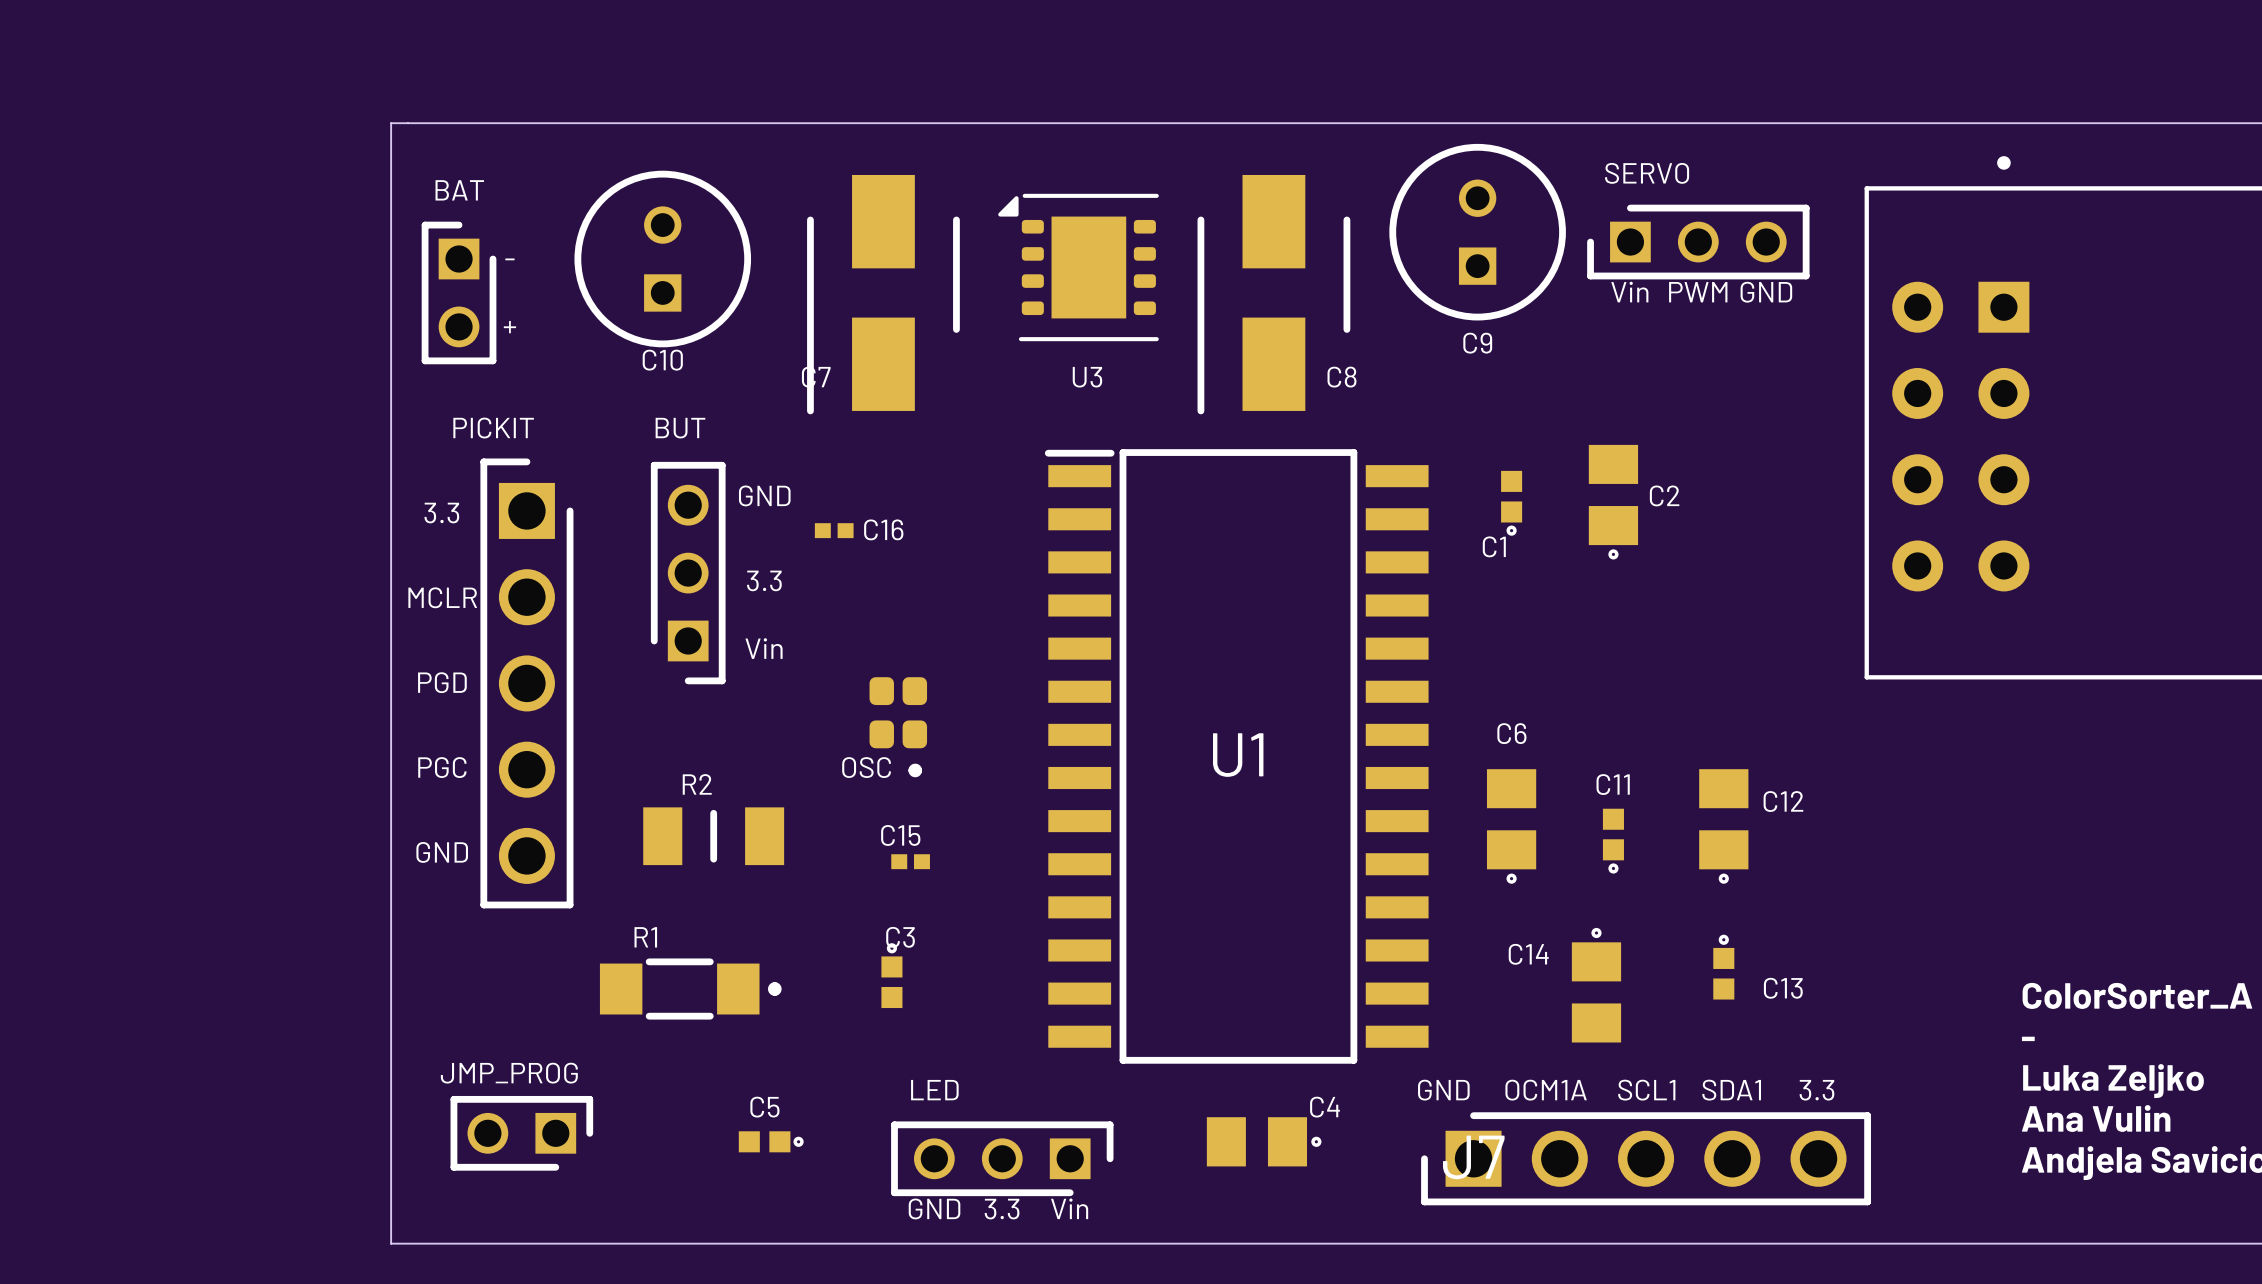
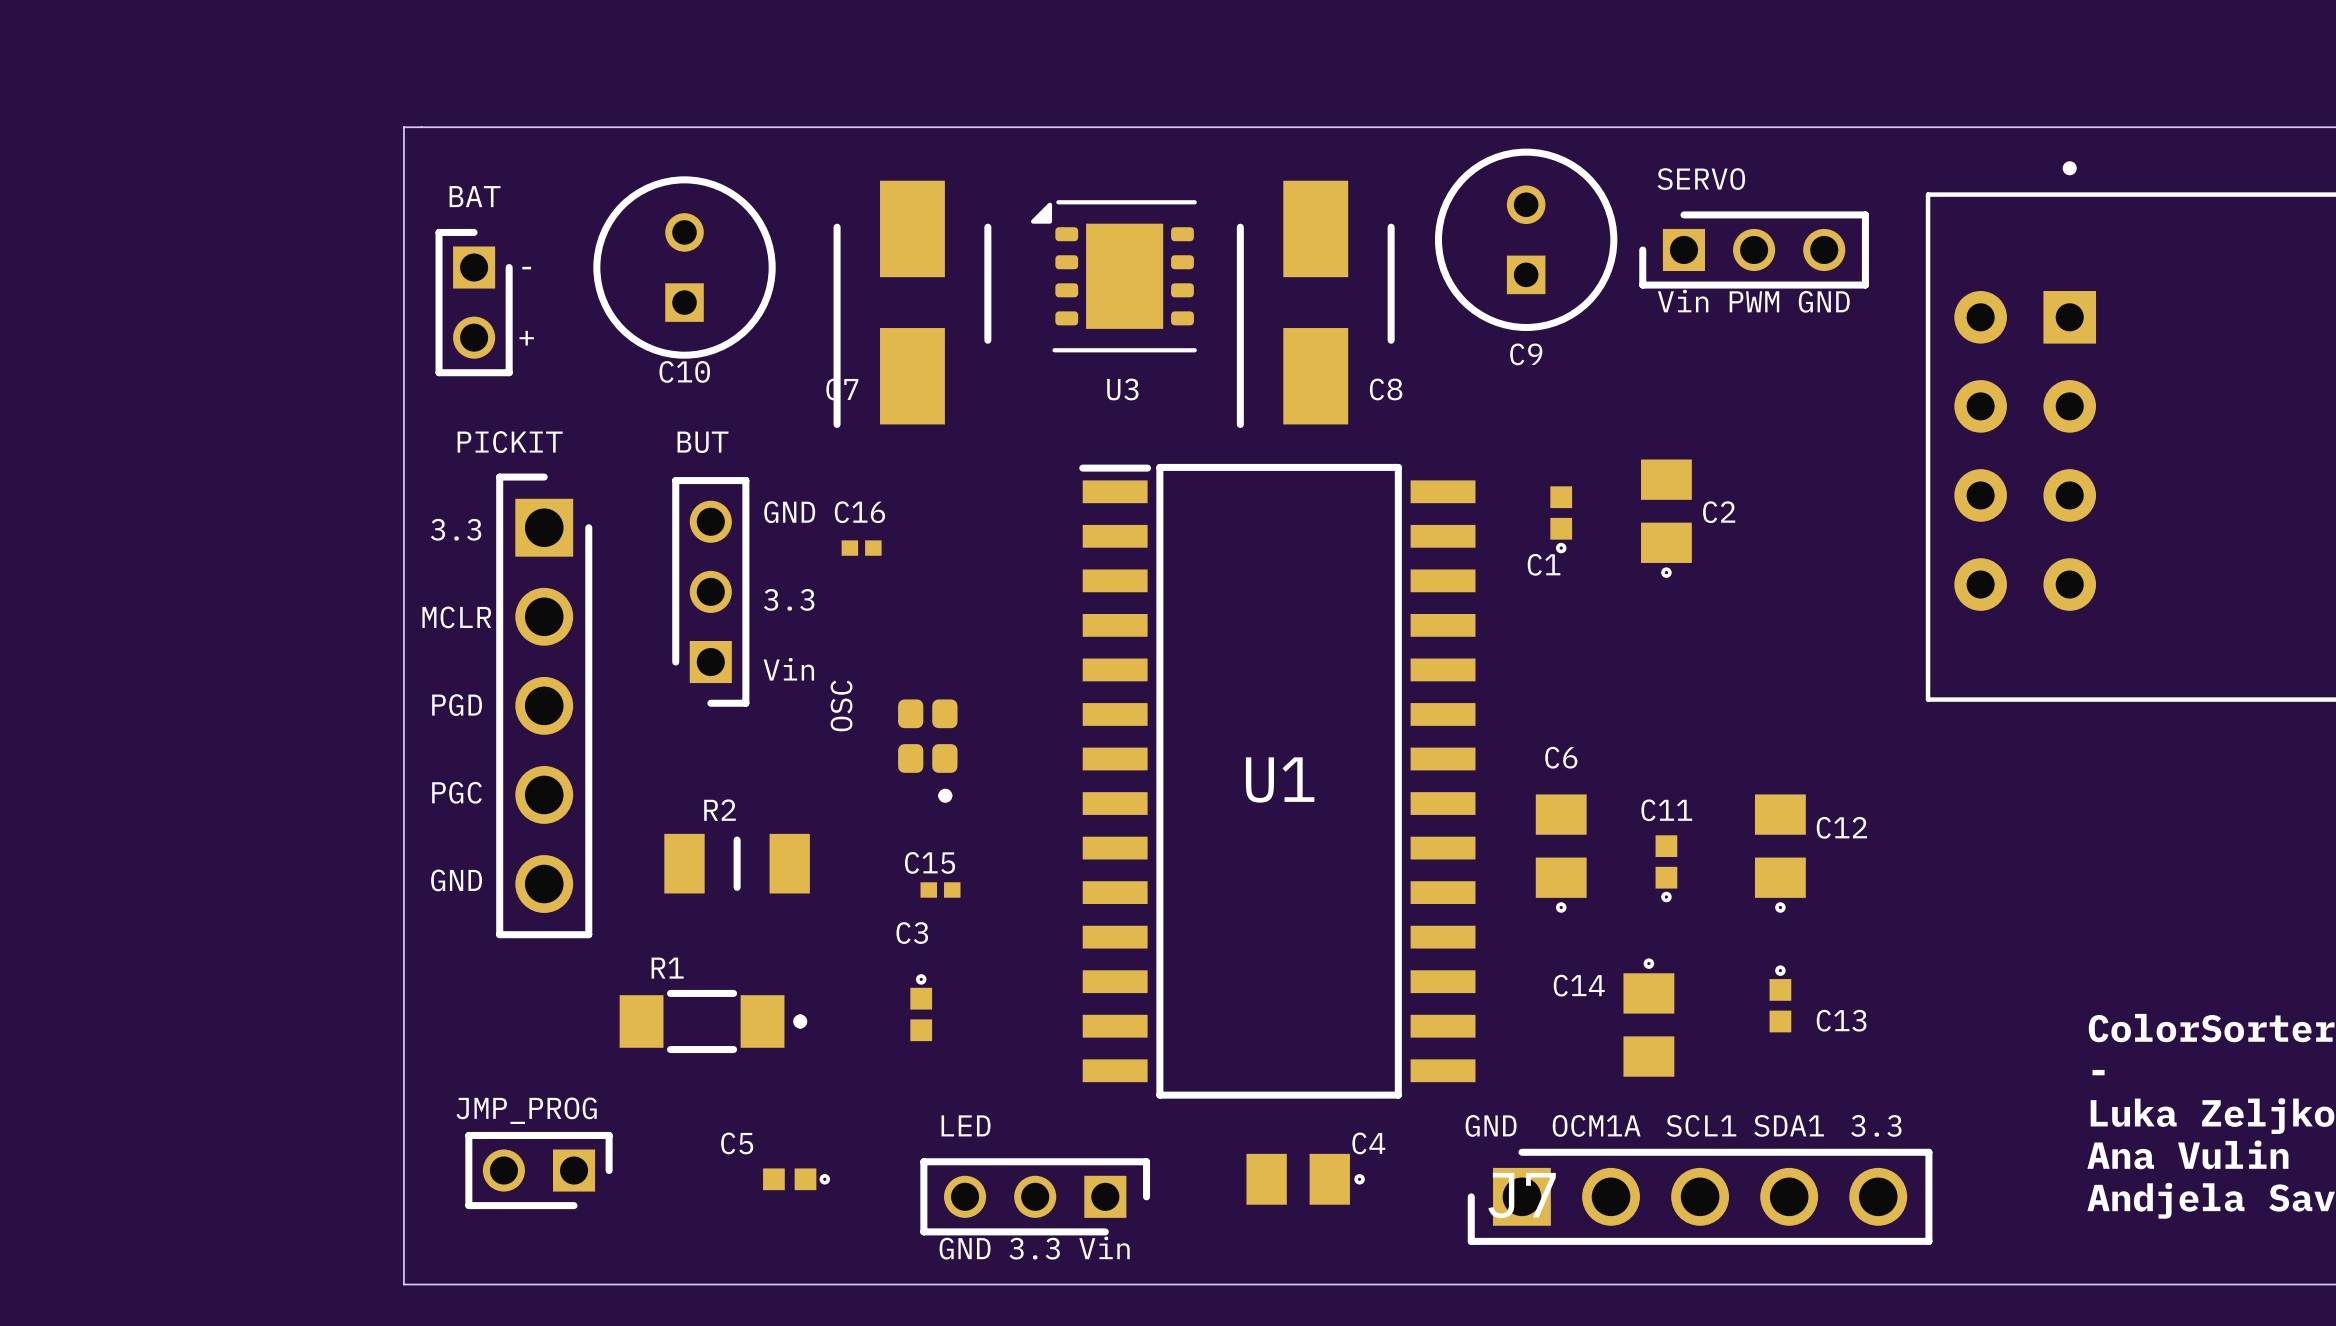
text position: C16 (883, 529) -> C16 (859, 512)
text rotation: 0° (866, 767) -> 90° counterclockwise (841, 705)
text position: OSC (866, 767) -> OSC (841, 705)
text position: C3 (900, 937) -> C3 (912, 933)
text position: C5 (764, 1107) -> C5 (737, 1143)

